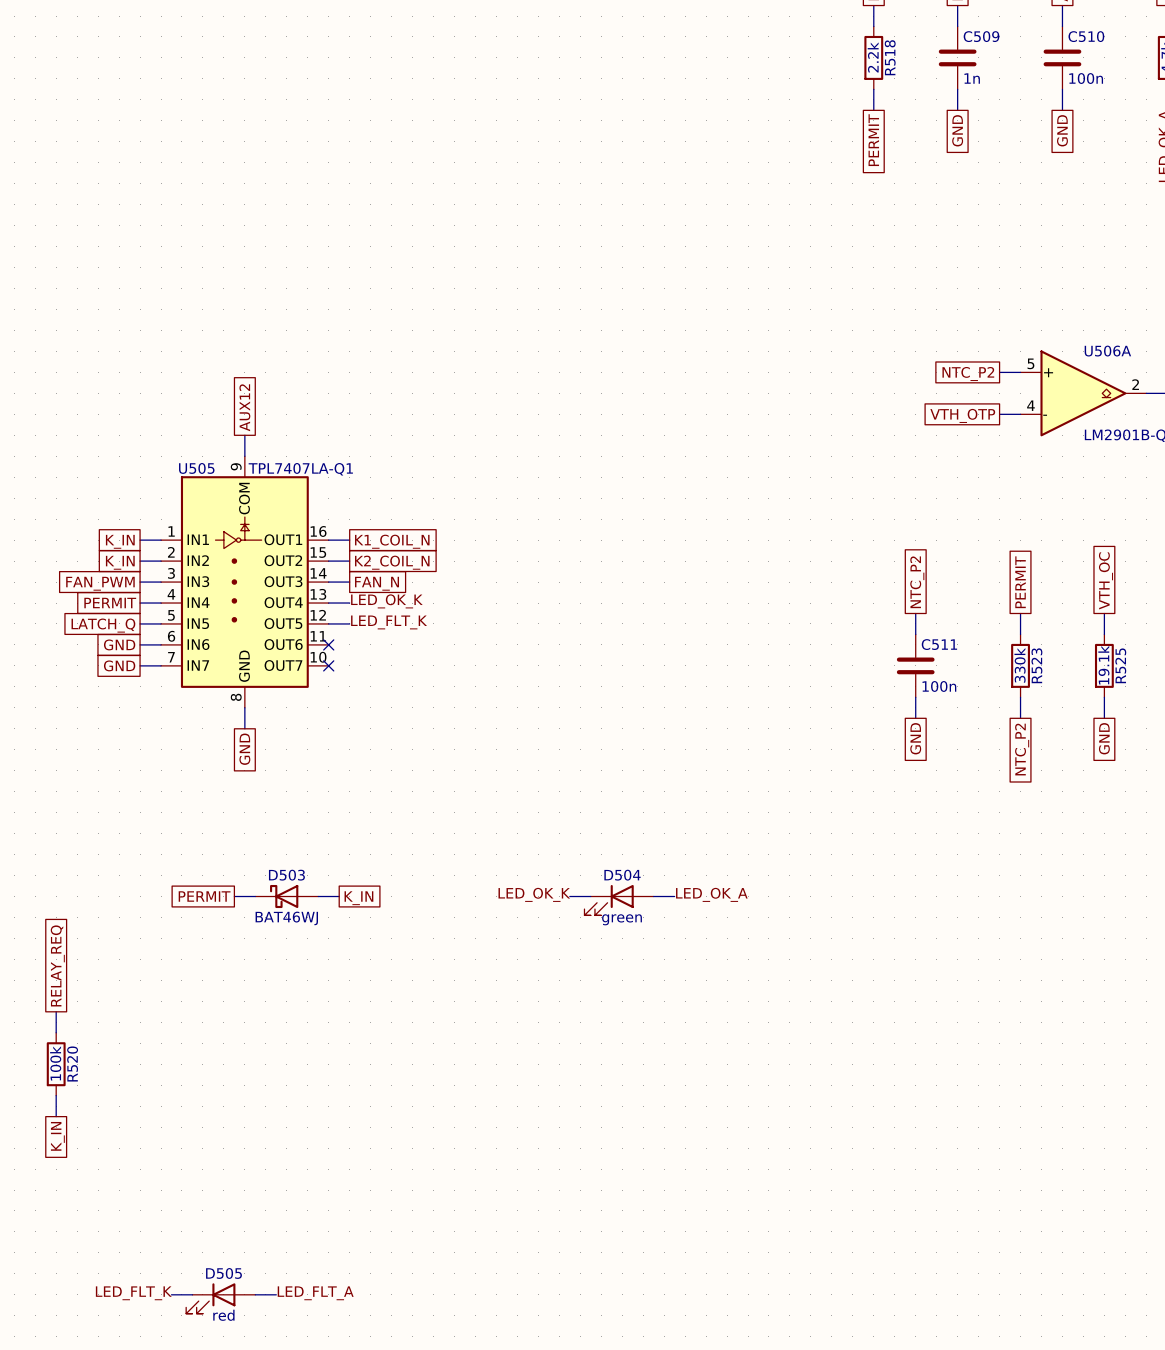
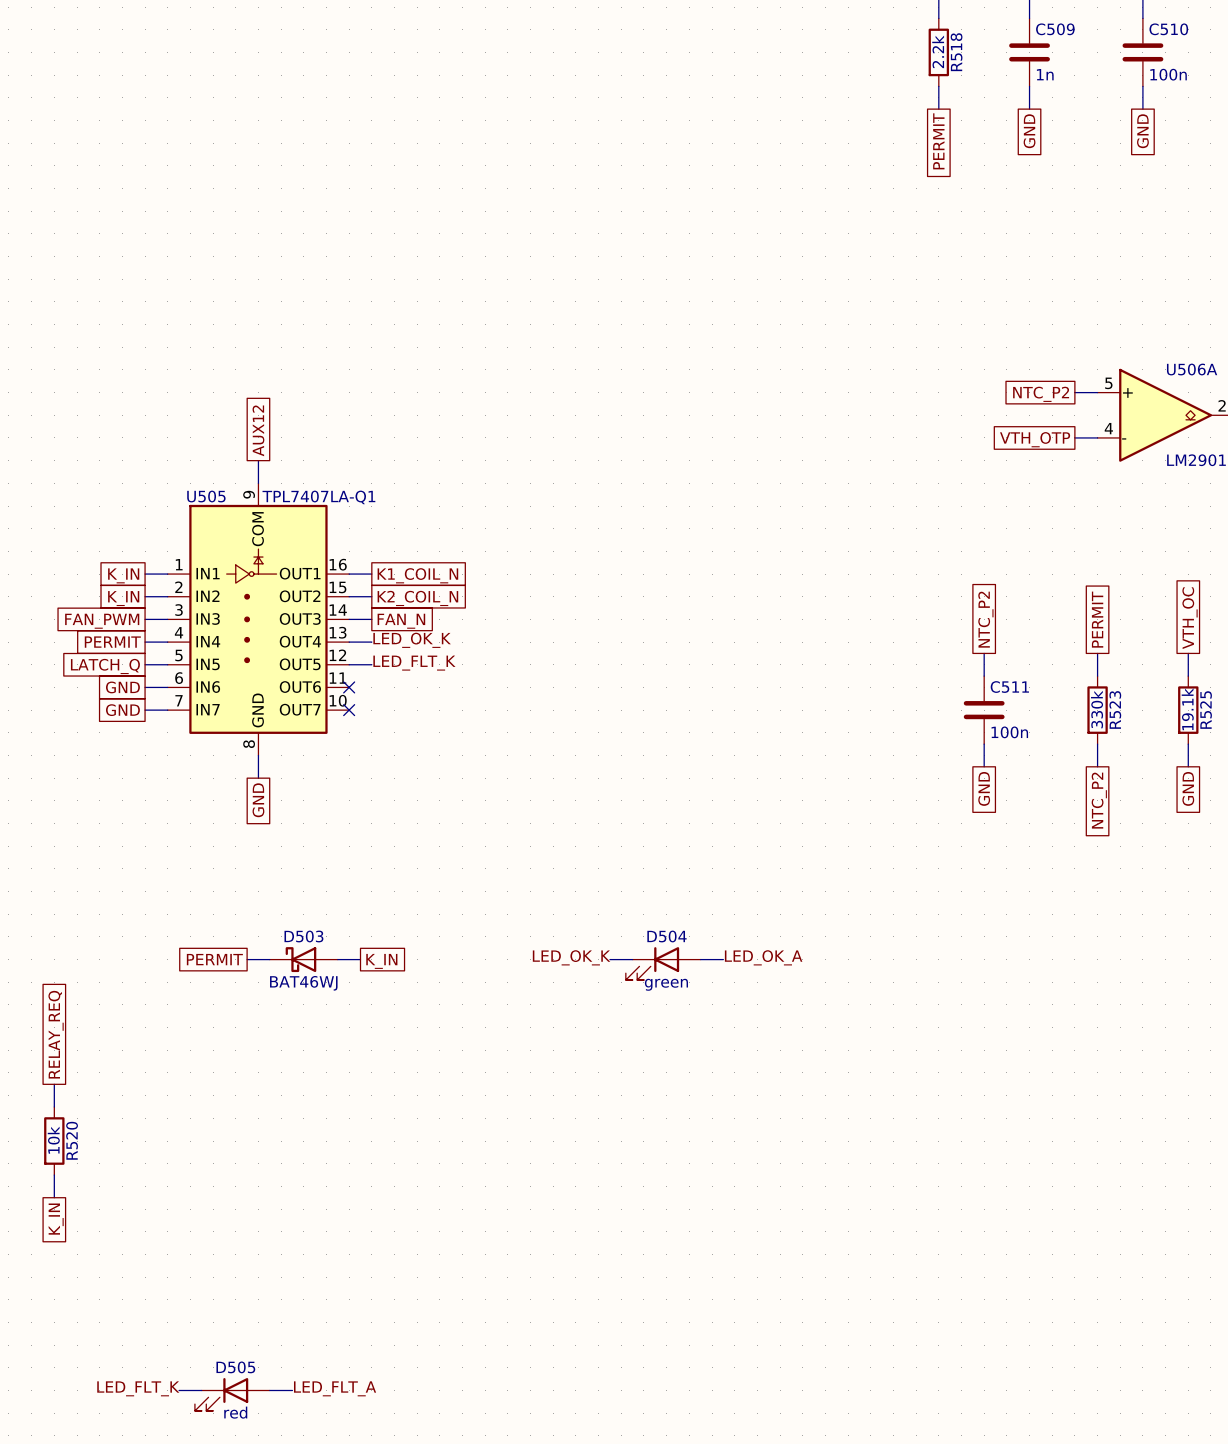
R520 value: 100k (55, 1063) -> 10k (53, 1140)

